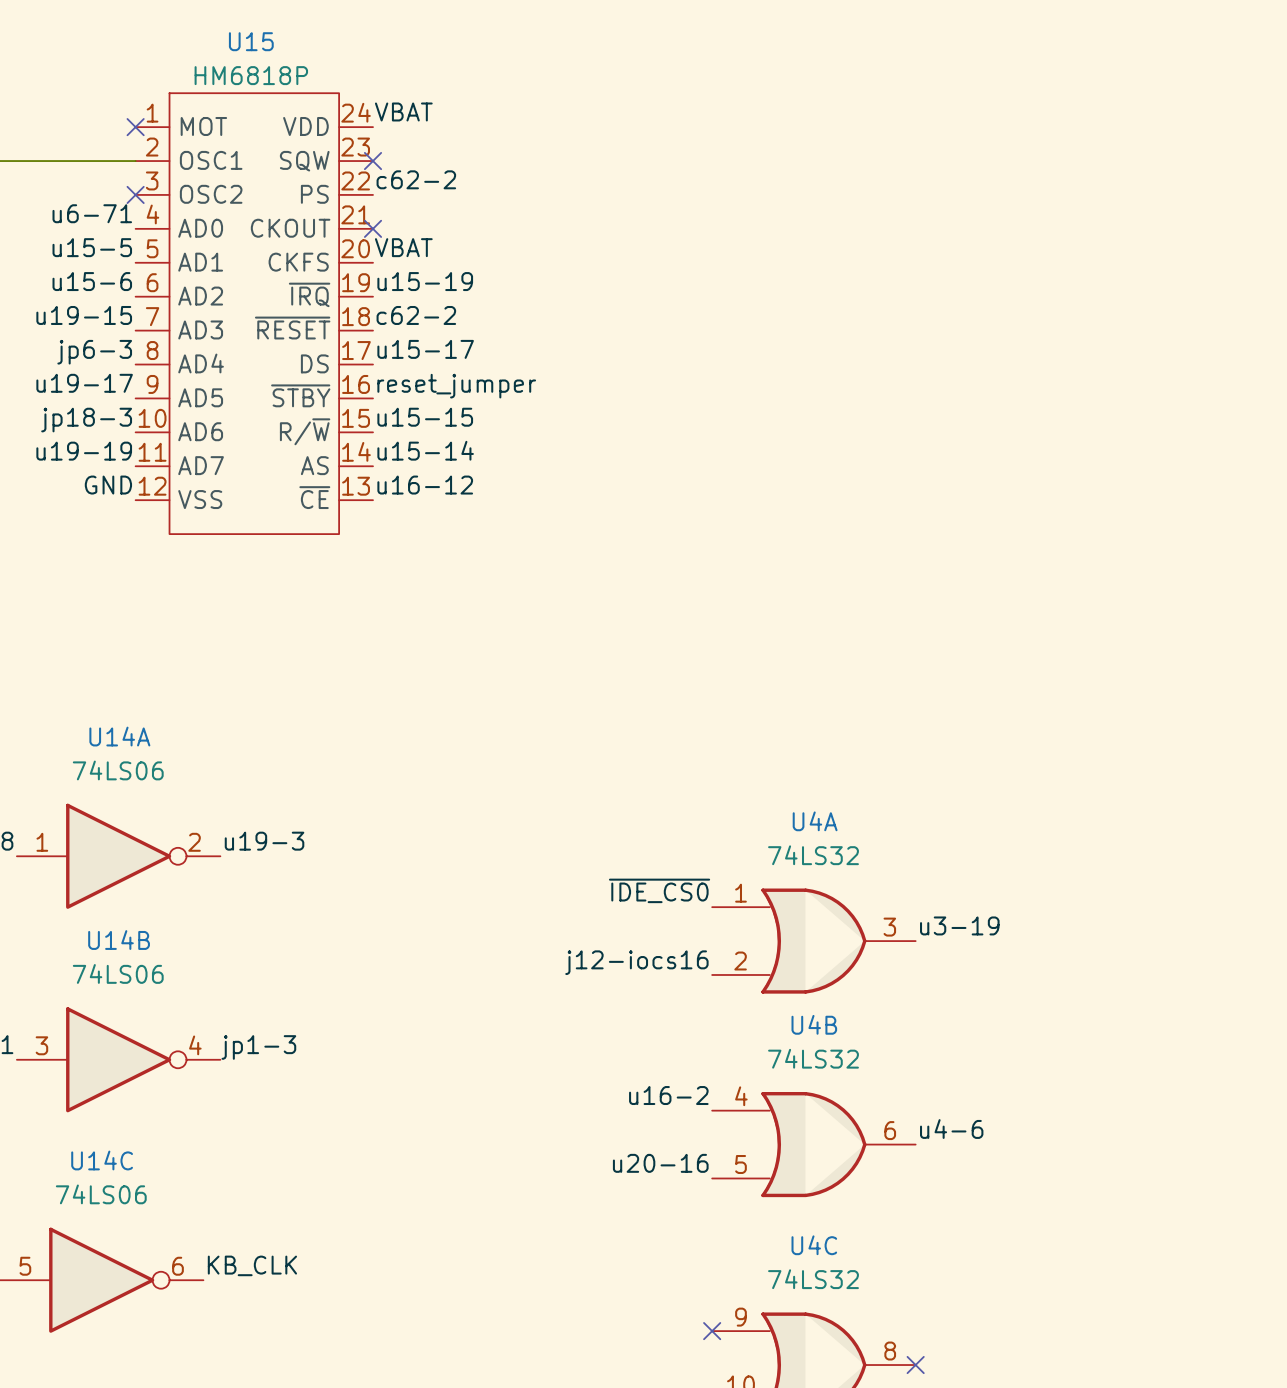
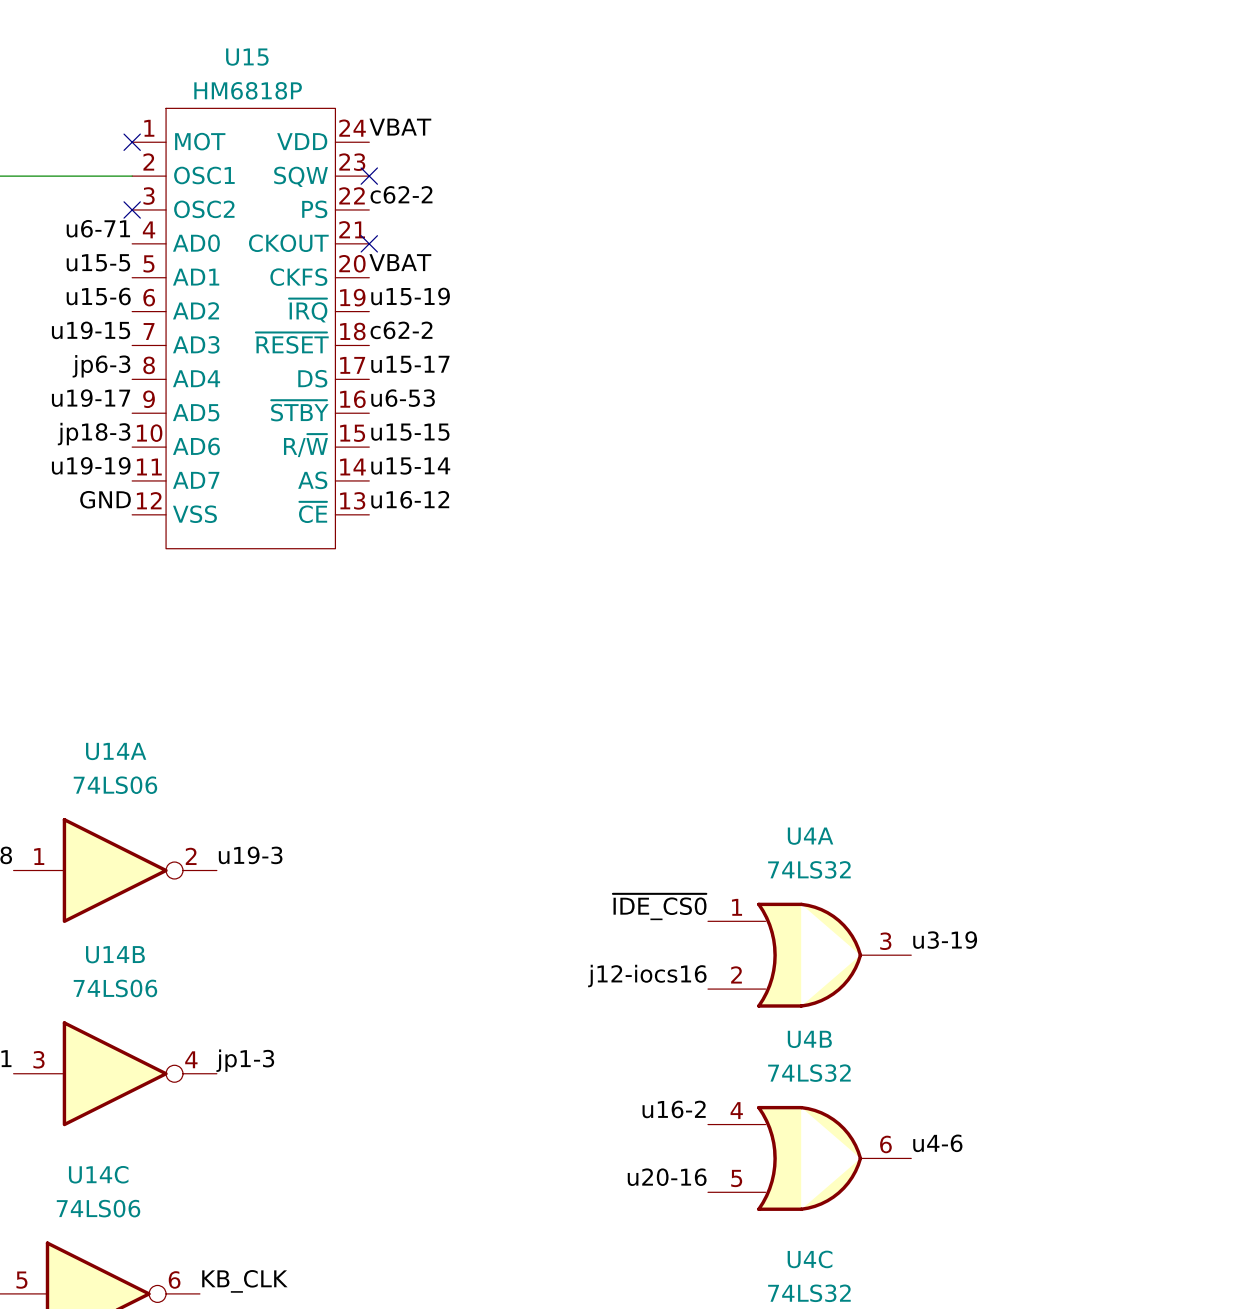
label: reset_jumper (456, 386) -> u6-53 (403, 398)

